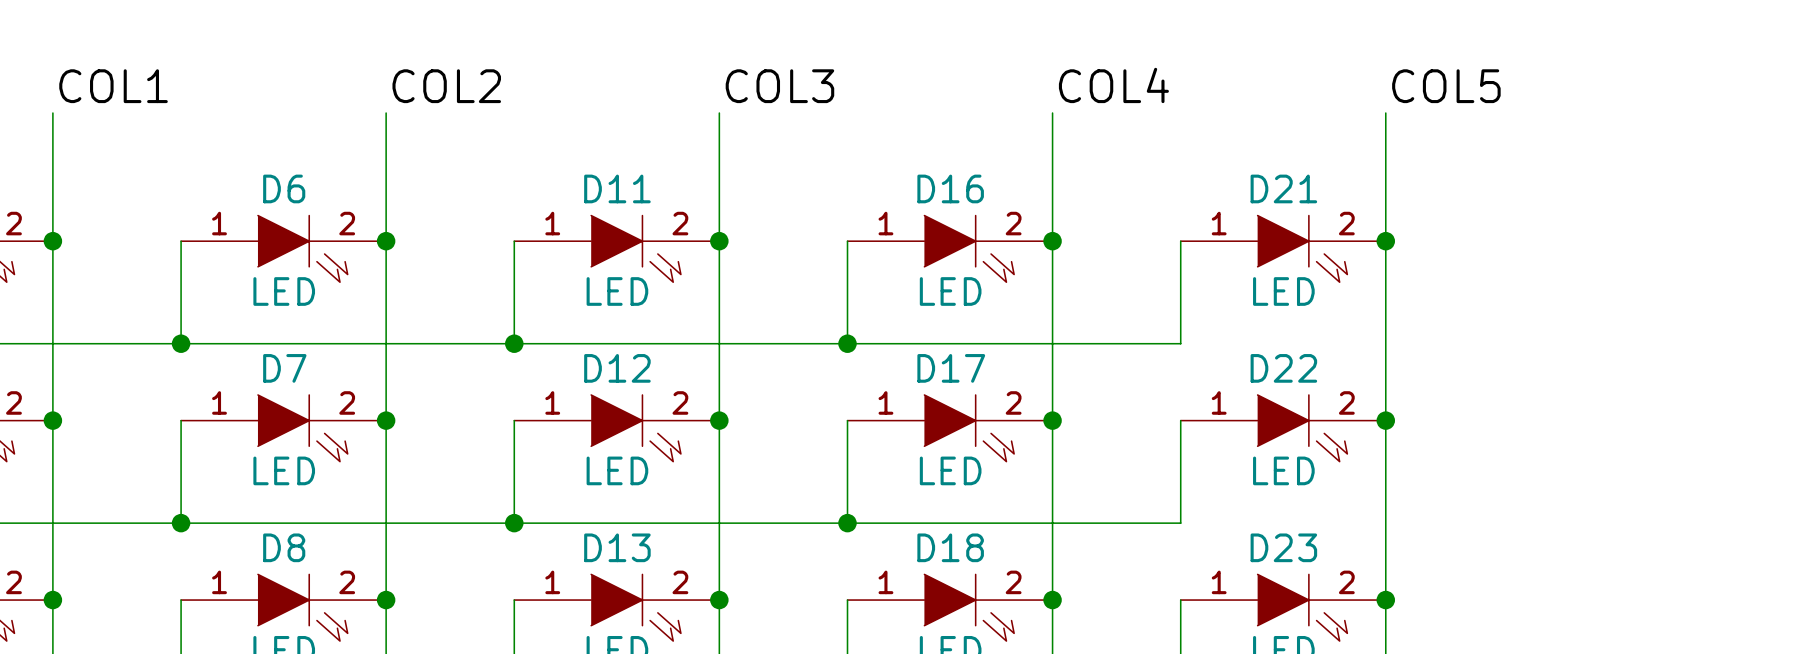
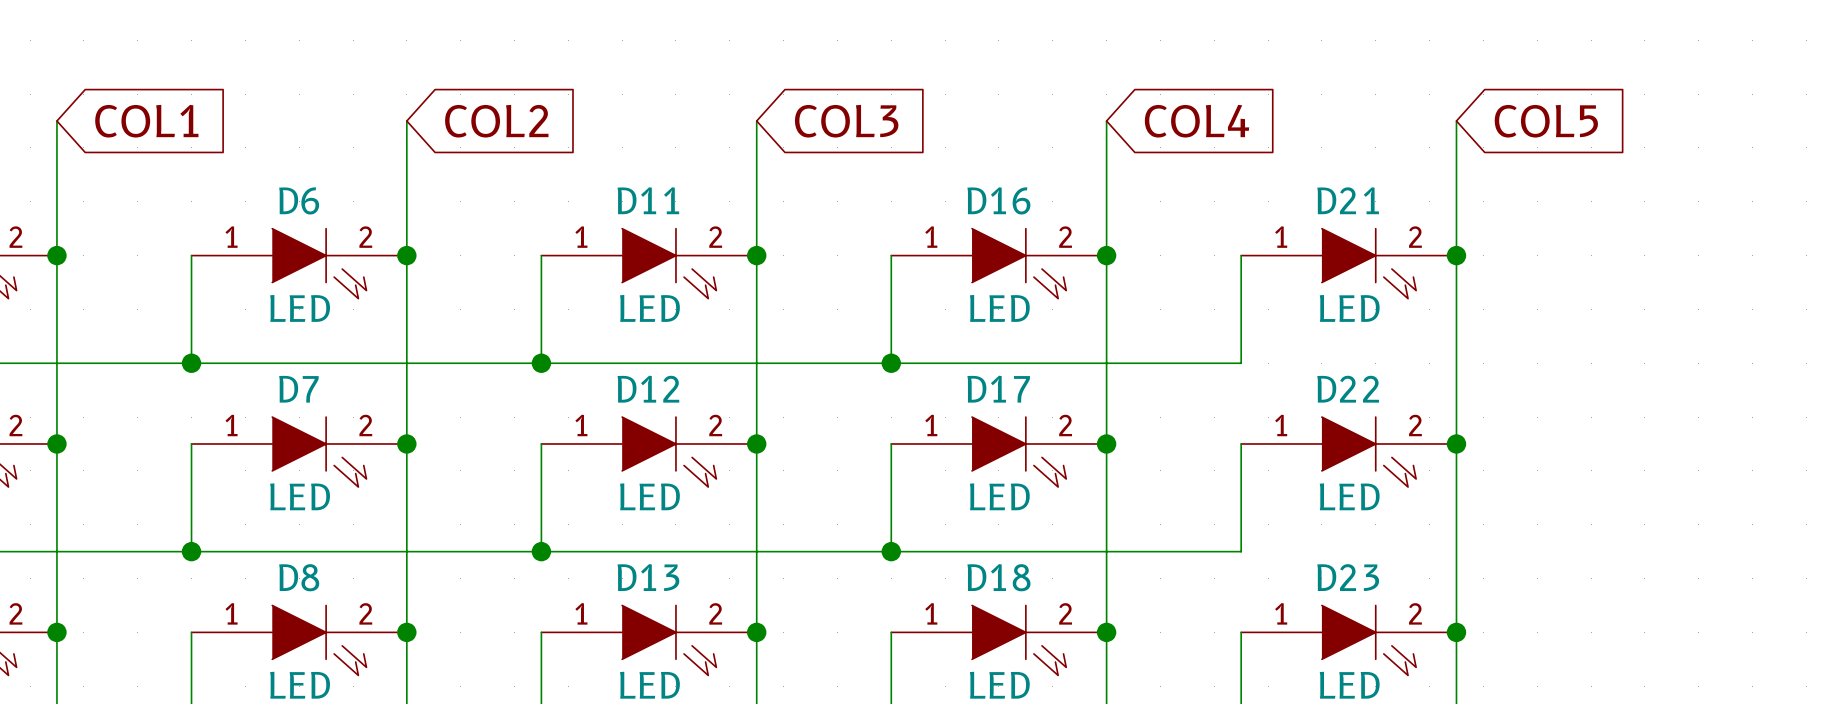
label: COL4 (1113, 85) -> none
label: COL1 (113, 86) -> none
label: COL2 (446, 86) -> none
label: COL3 (779, 86) -> none
label: COL5 (1446, 86) -> none
global label: none -> COL4 (1196, 121)
global label: none -> COL1 (146, 121)
global label: none -> COL2 (496, 121)
global label: none -> COL3 (846, 121)
global label: none -> COL5 (1546, 121)

